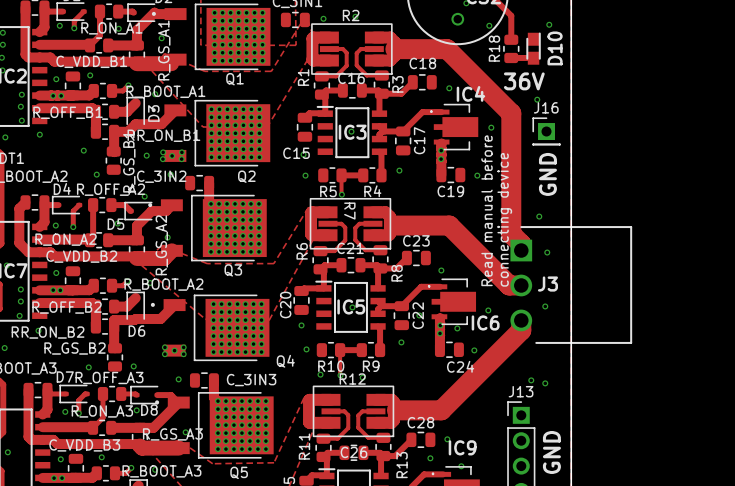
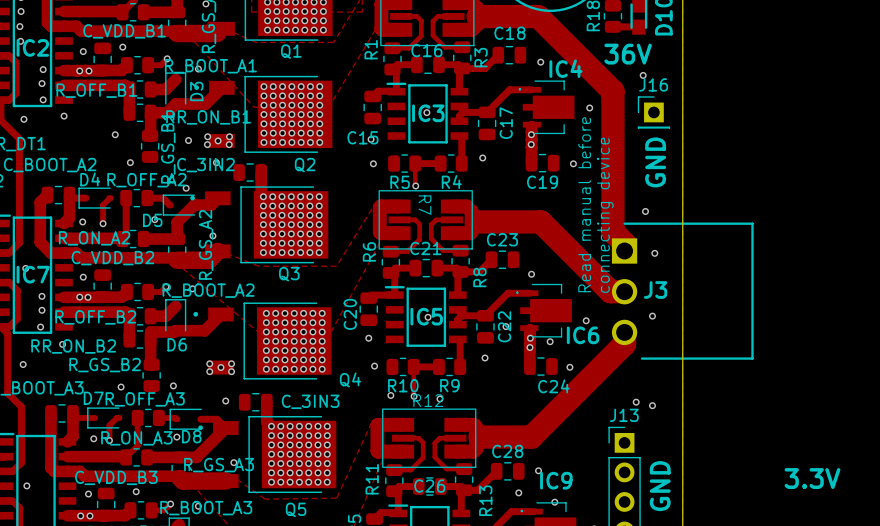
text: none -> 3.3V (812, 478)

